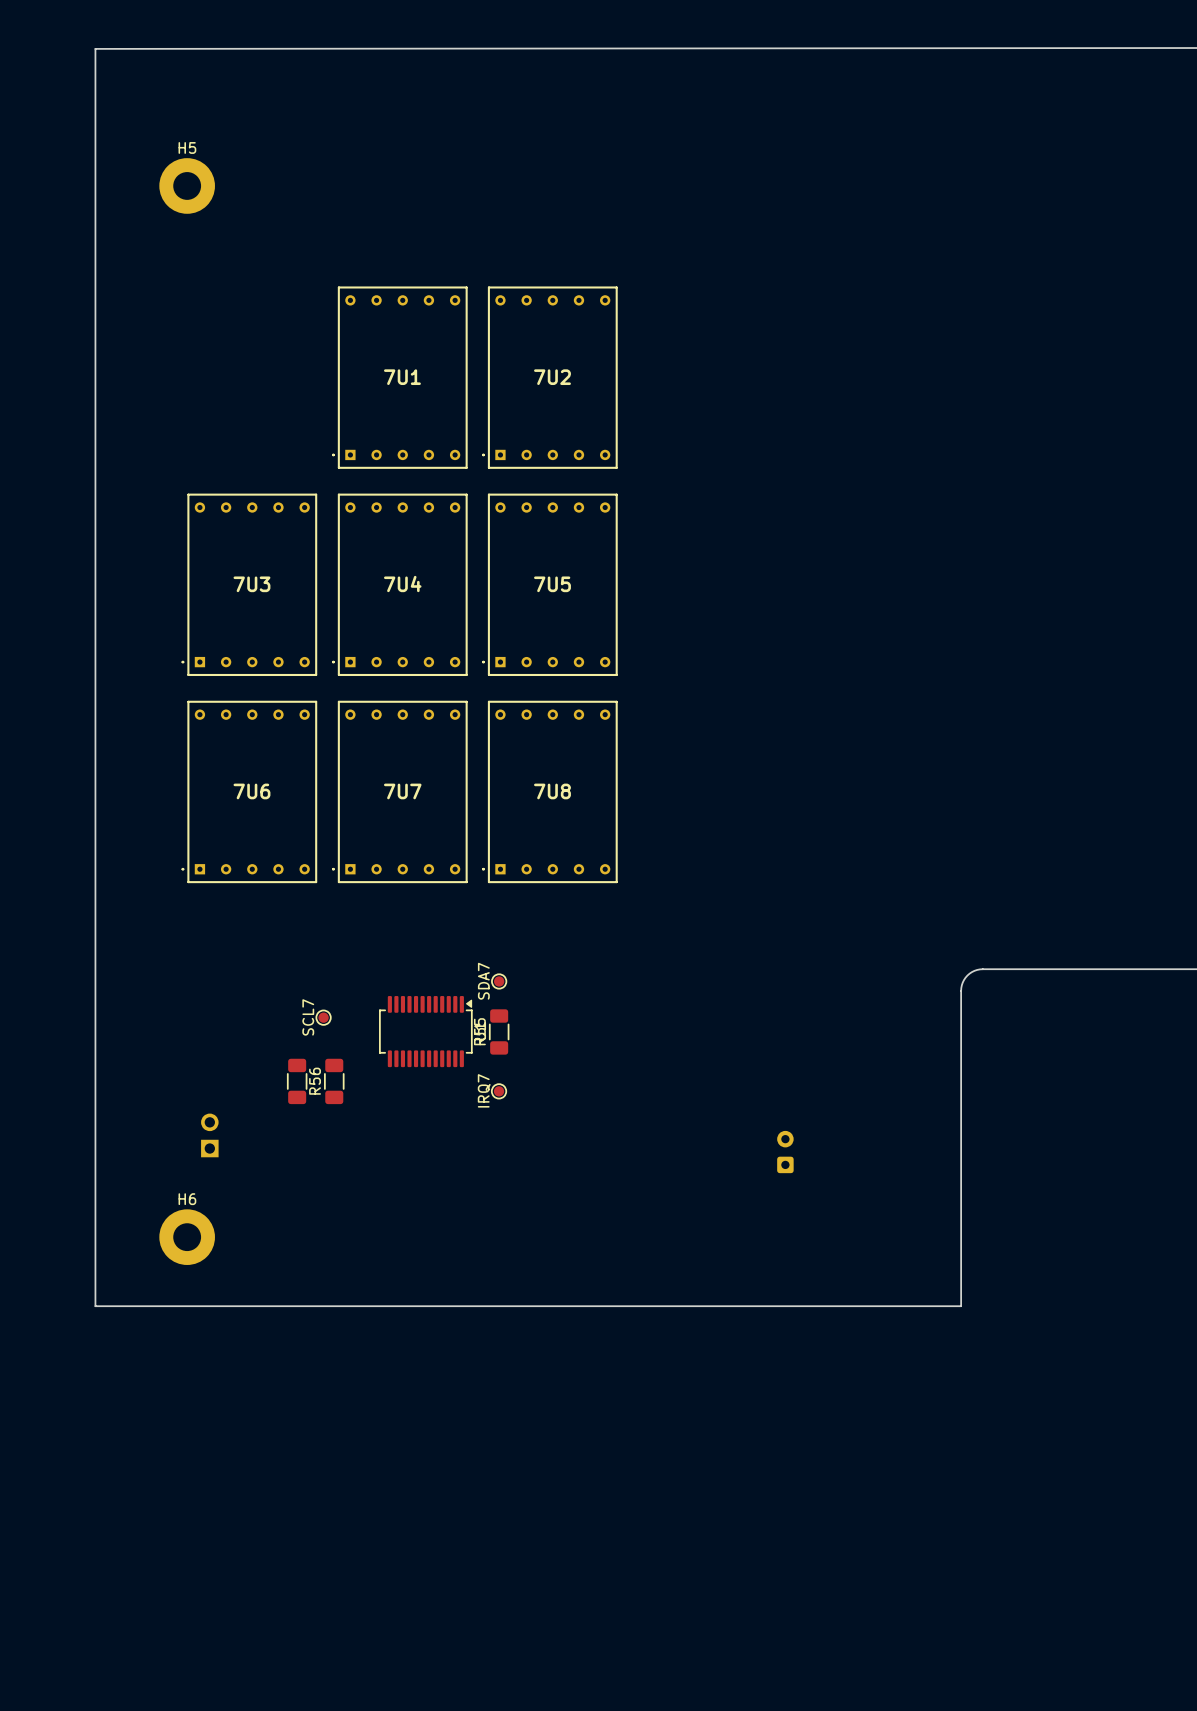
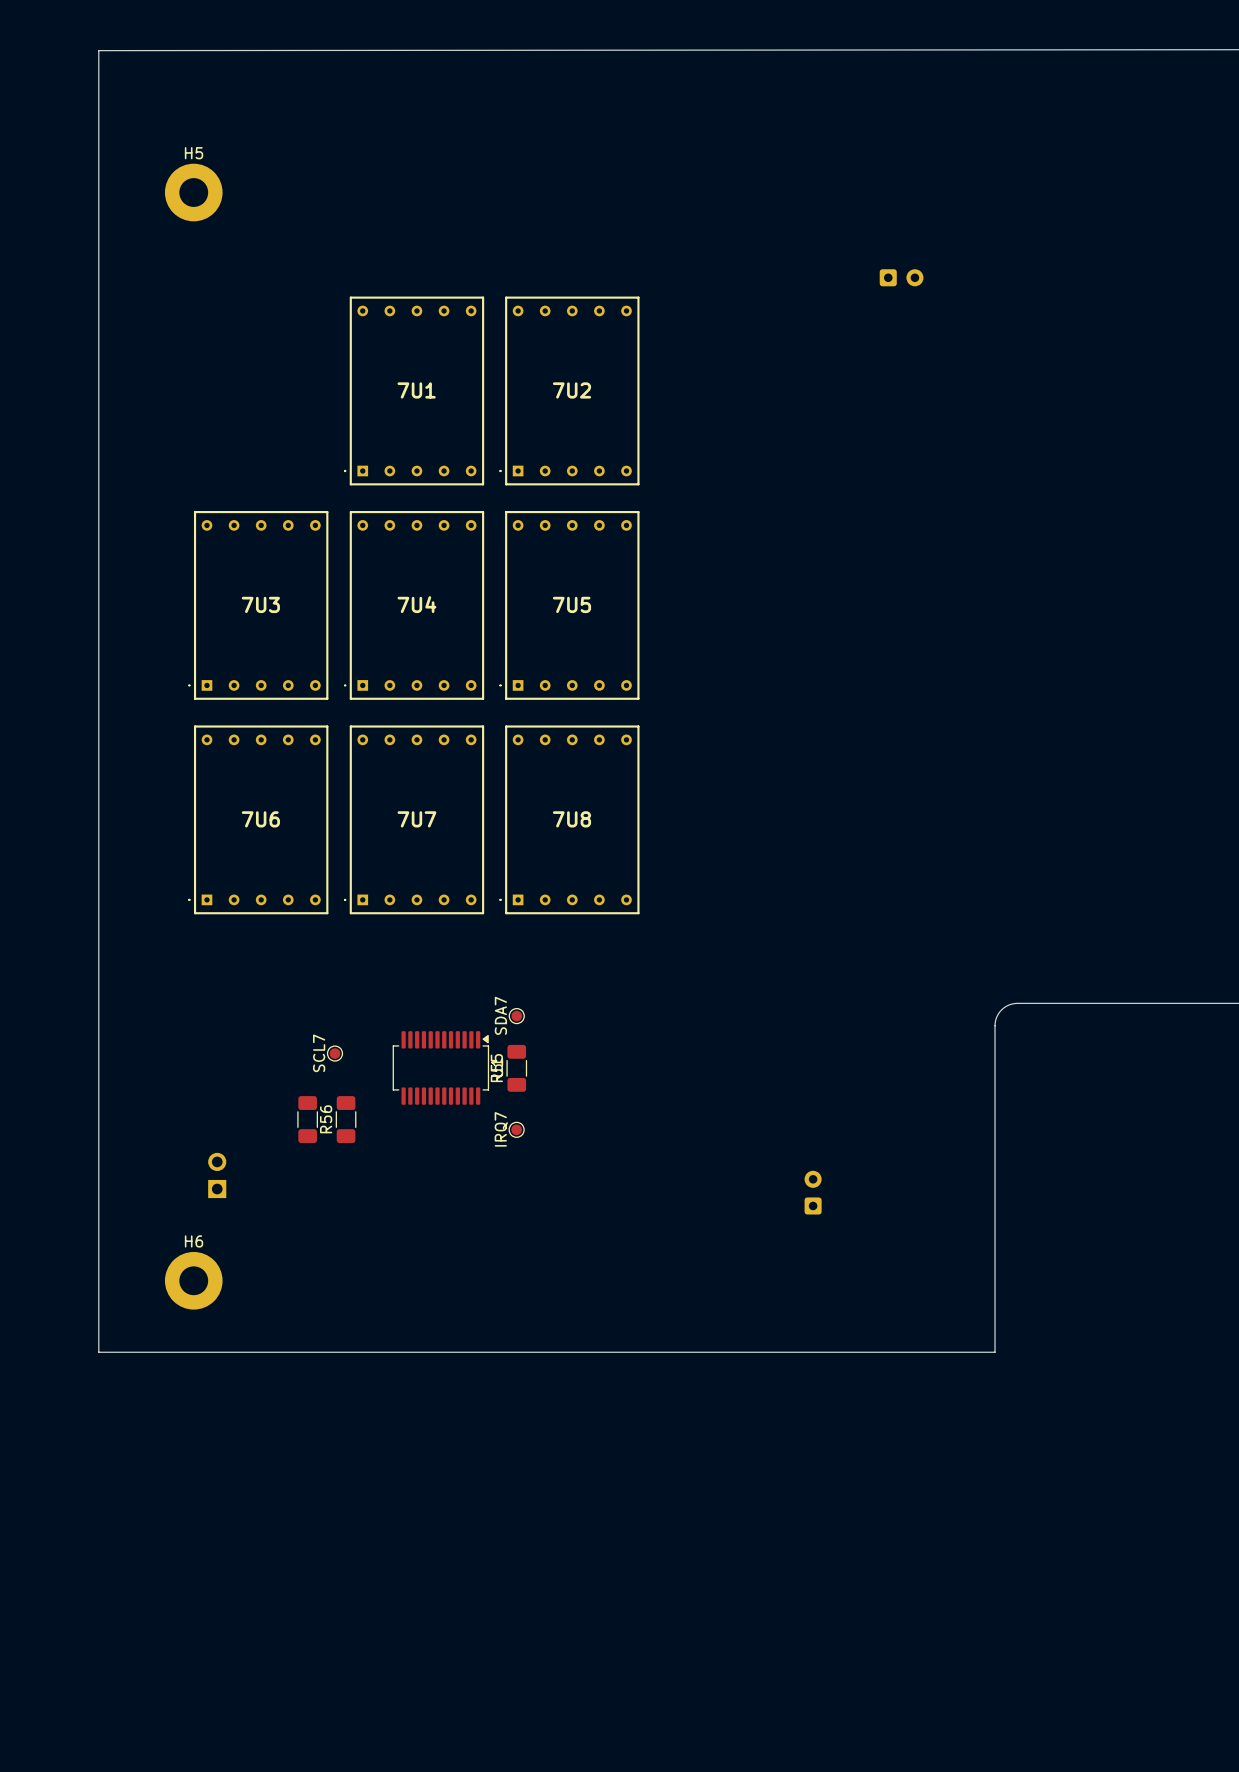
part: none -> (901, 277)

